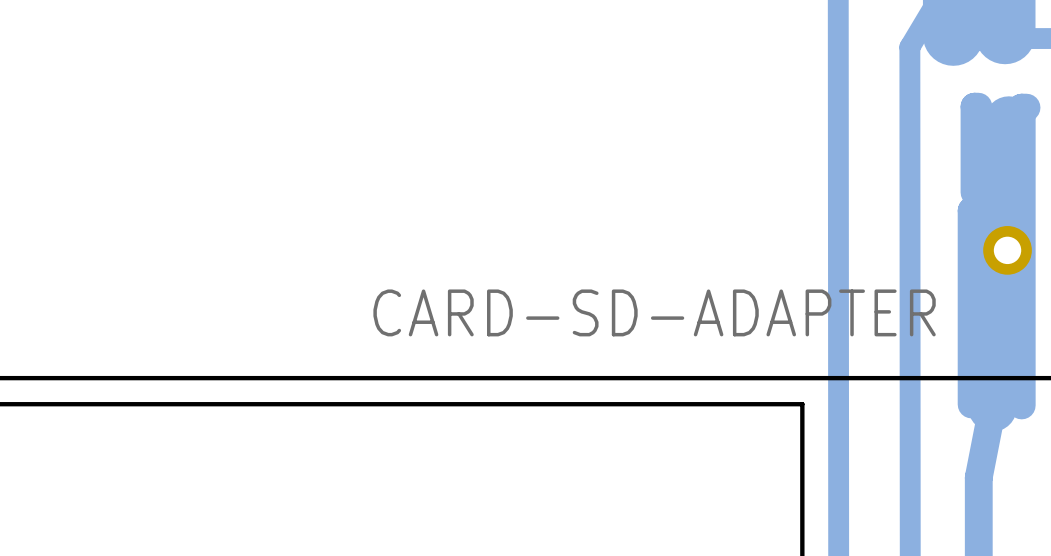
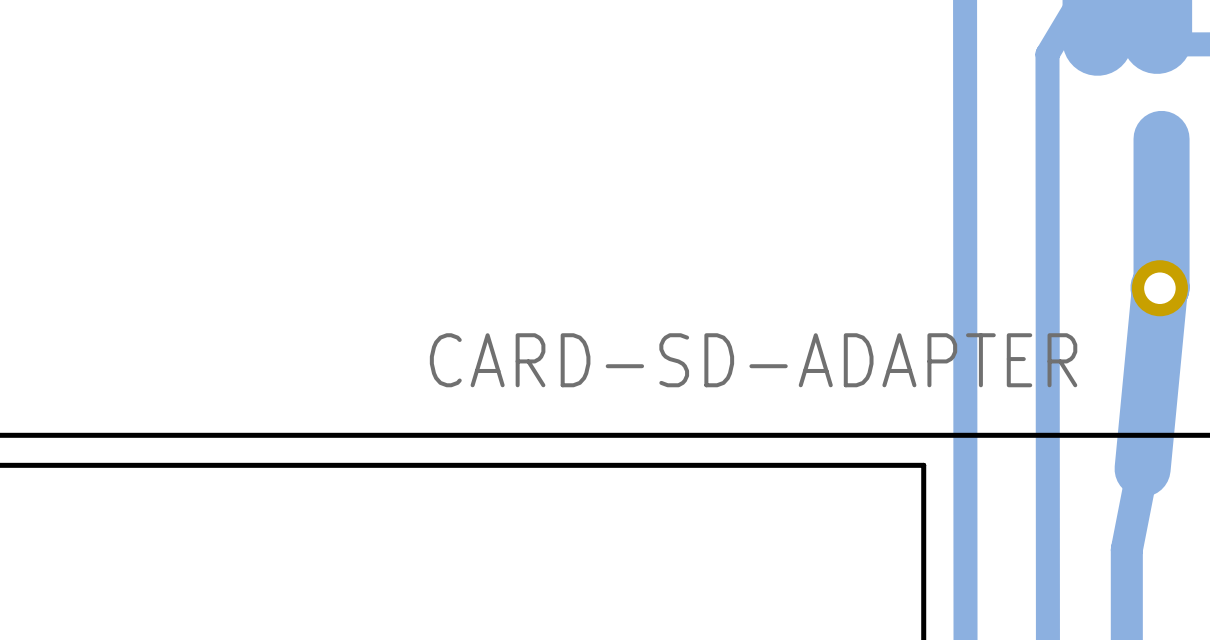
track: (978, 106) (974, 106) (974, 192) -> none
track: (1026, 107) (1021, 107) (1021, 405) -> none
track: (977, 210) (971, 210) (971, 404) -> none

